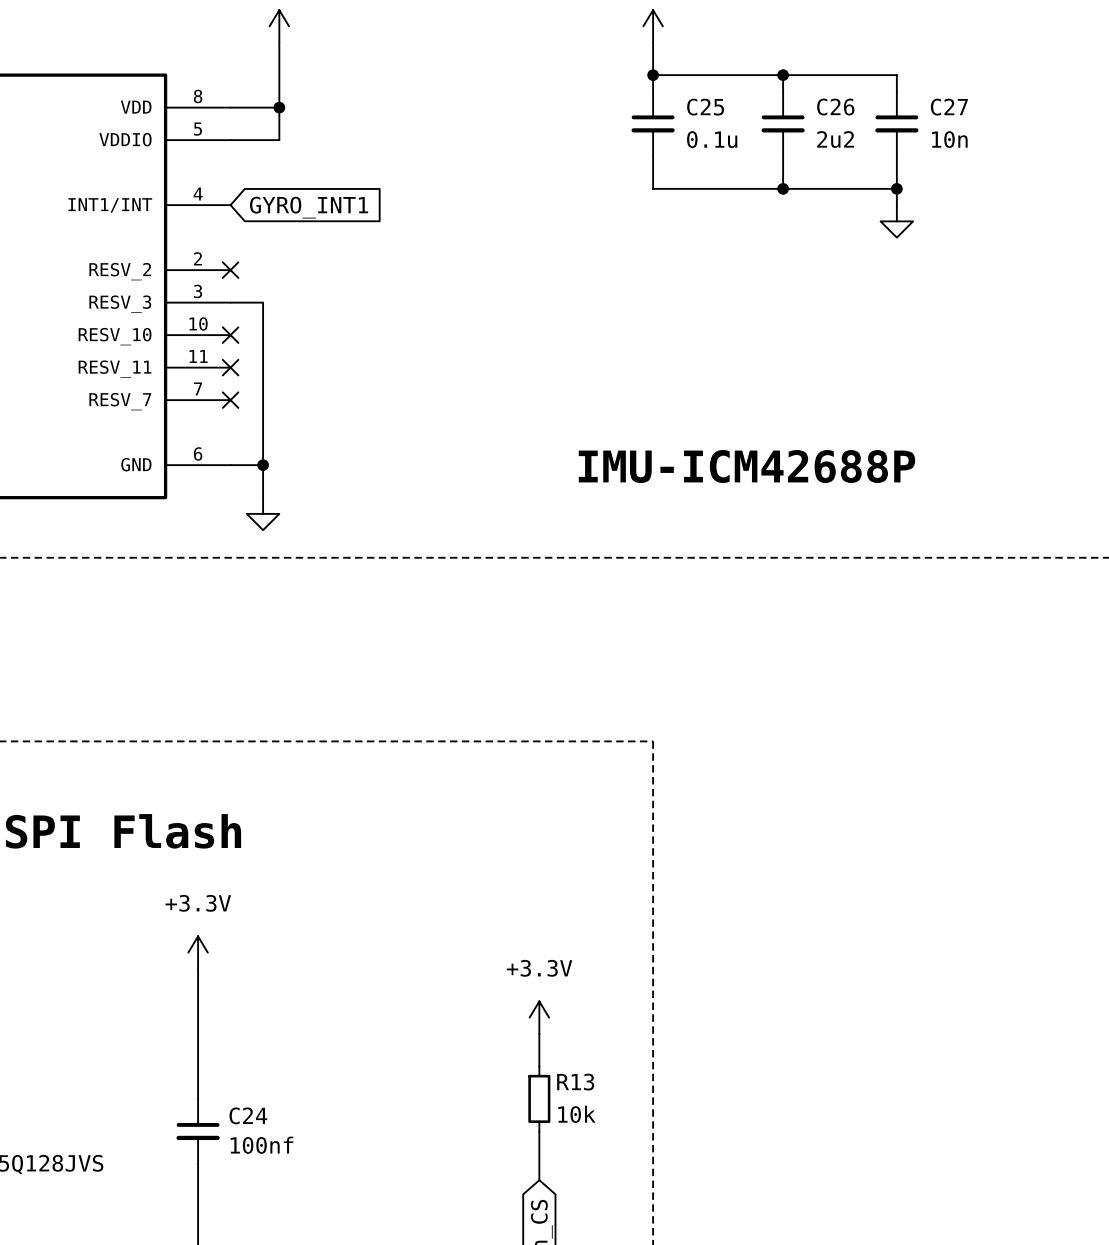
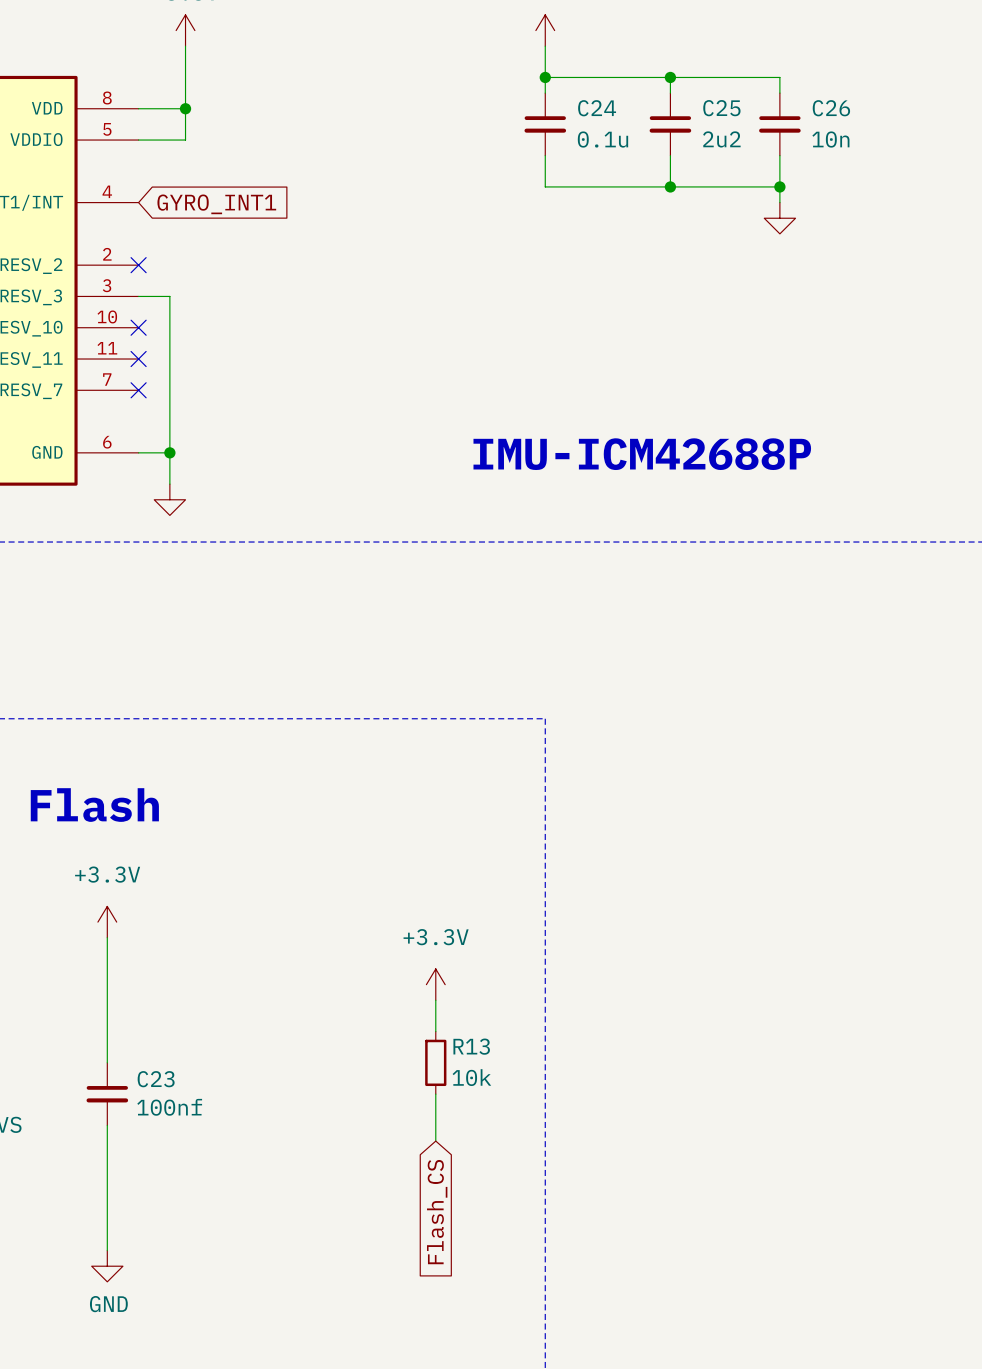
C25 name: C25 (705, 107) -> C24 (597, 108)
C26 name: C26 (835, 107) -> C25 (721, 108)
C27 name: C27 (949, 107) -> C26 (831, 108)
C24 name: C24 (248, 1115) -> C23 (156, 1079)

